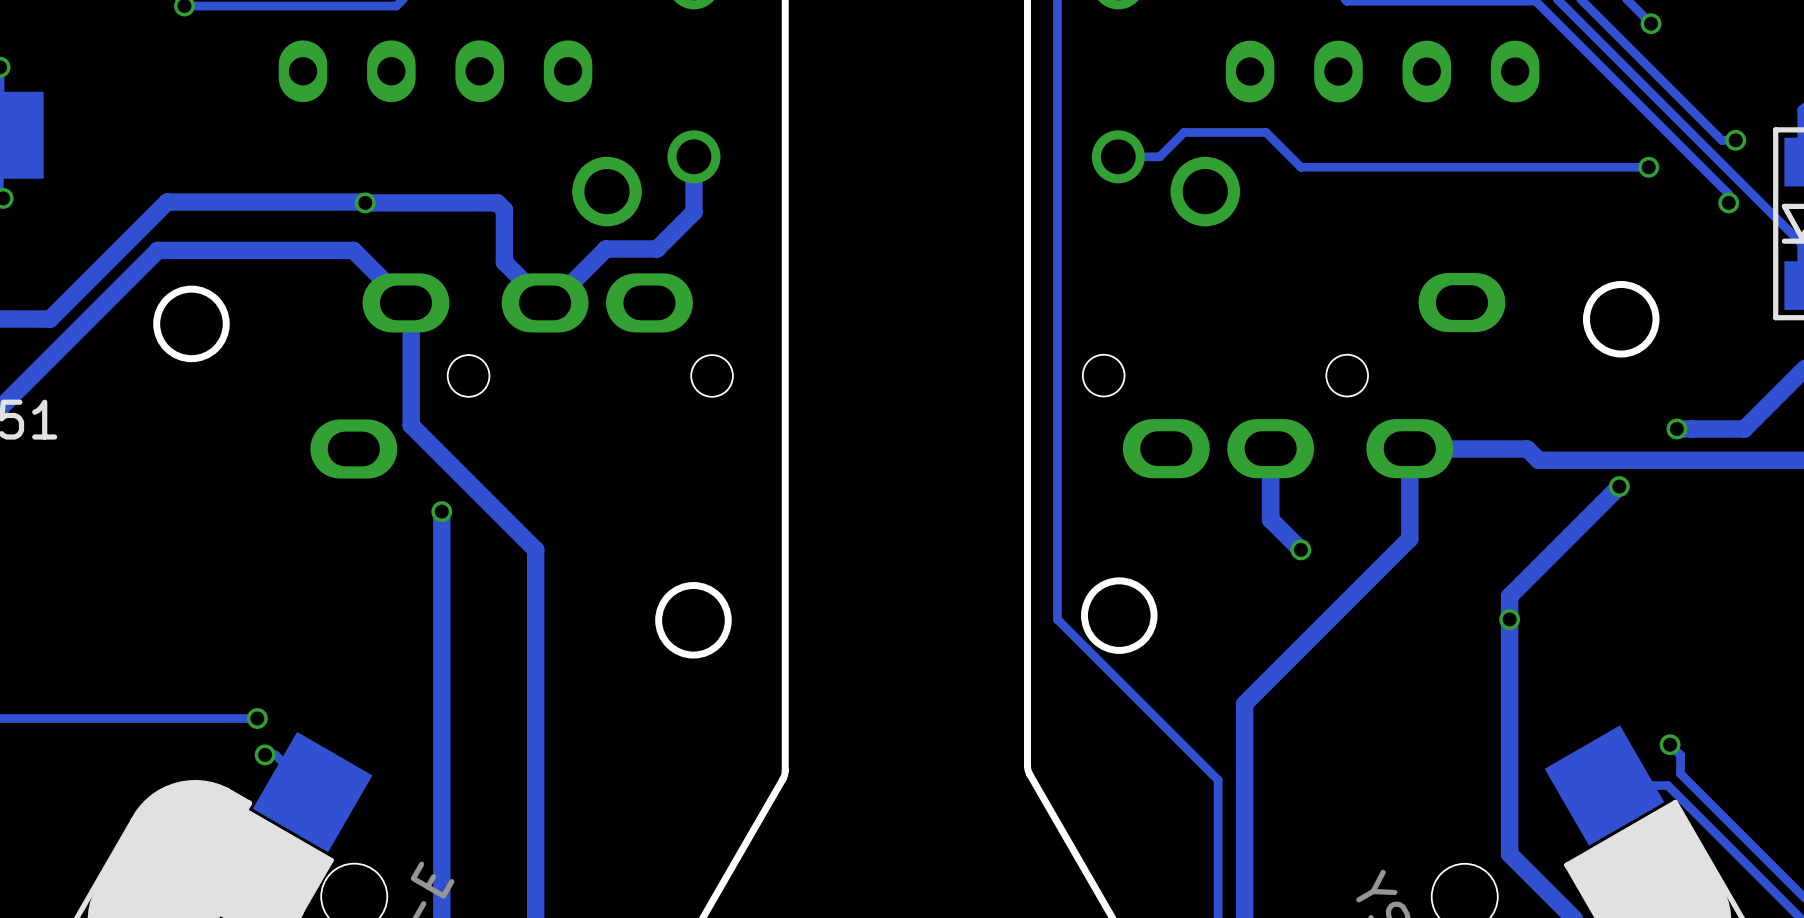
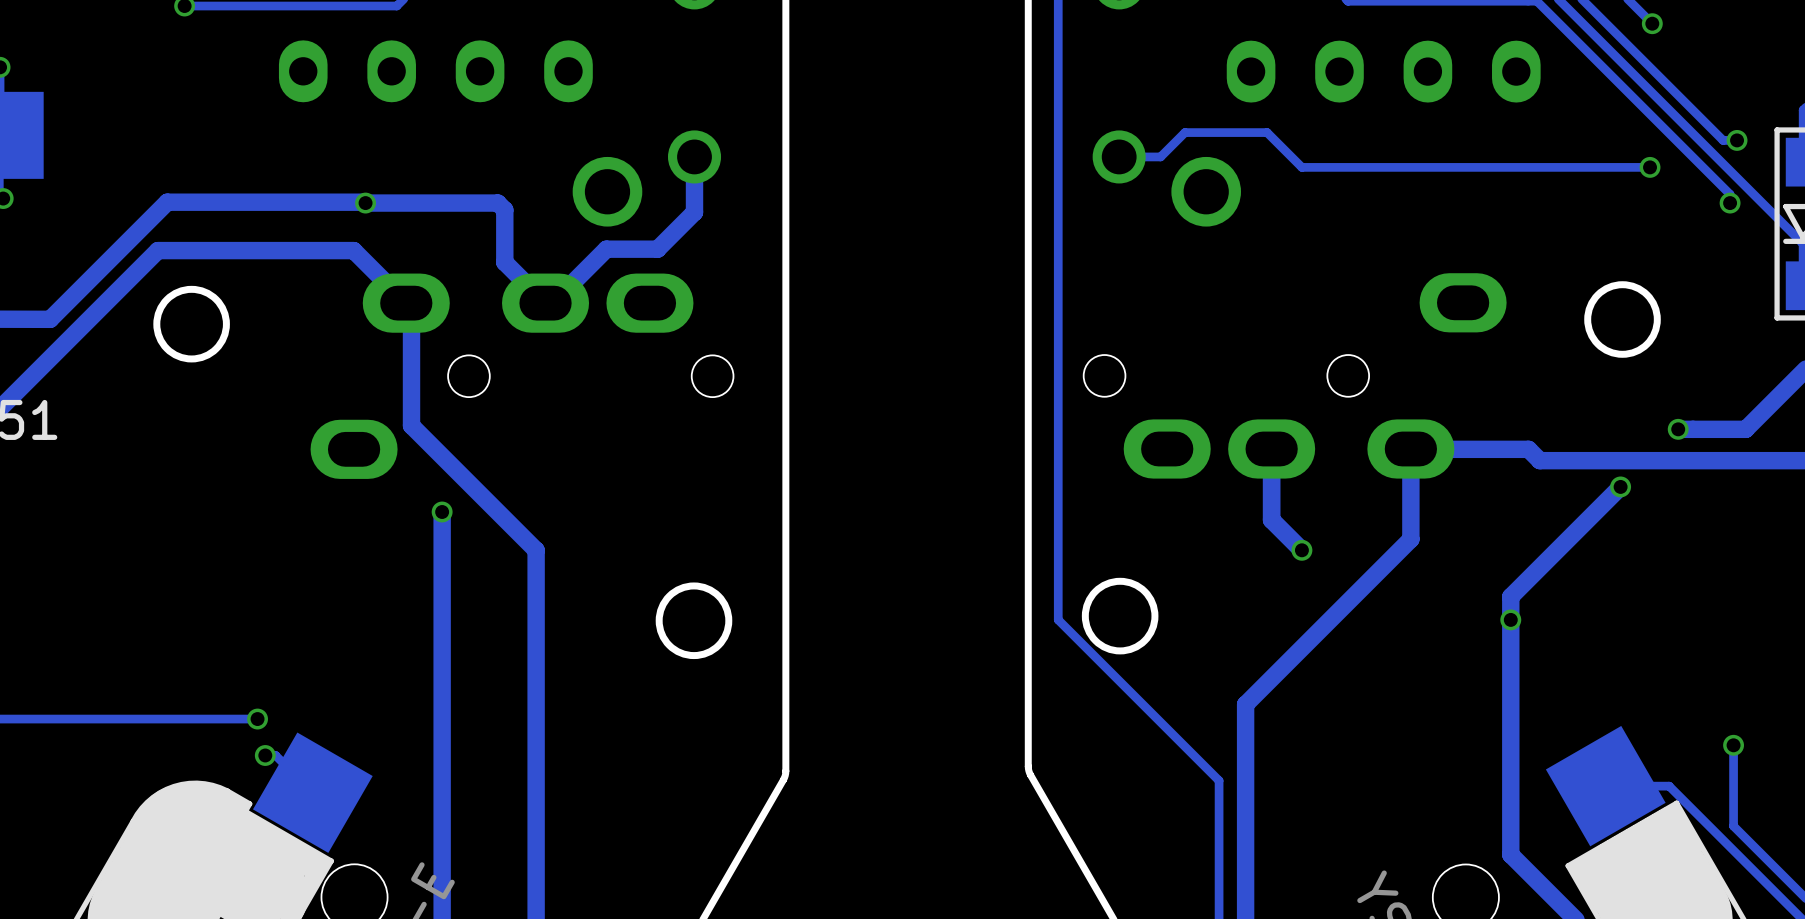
track: (1670, 744) (1680, 755) (1680, 773) (1732, 825) -> (1733, 745) (1733, 826)
via position: (1670, 744) -> (1733, 745)

